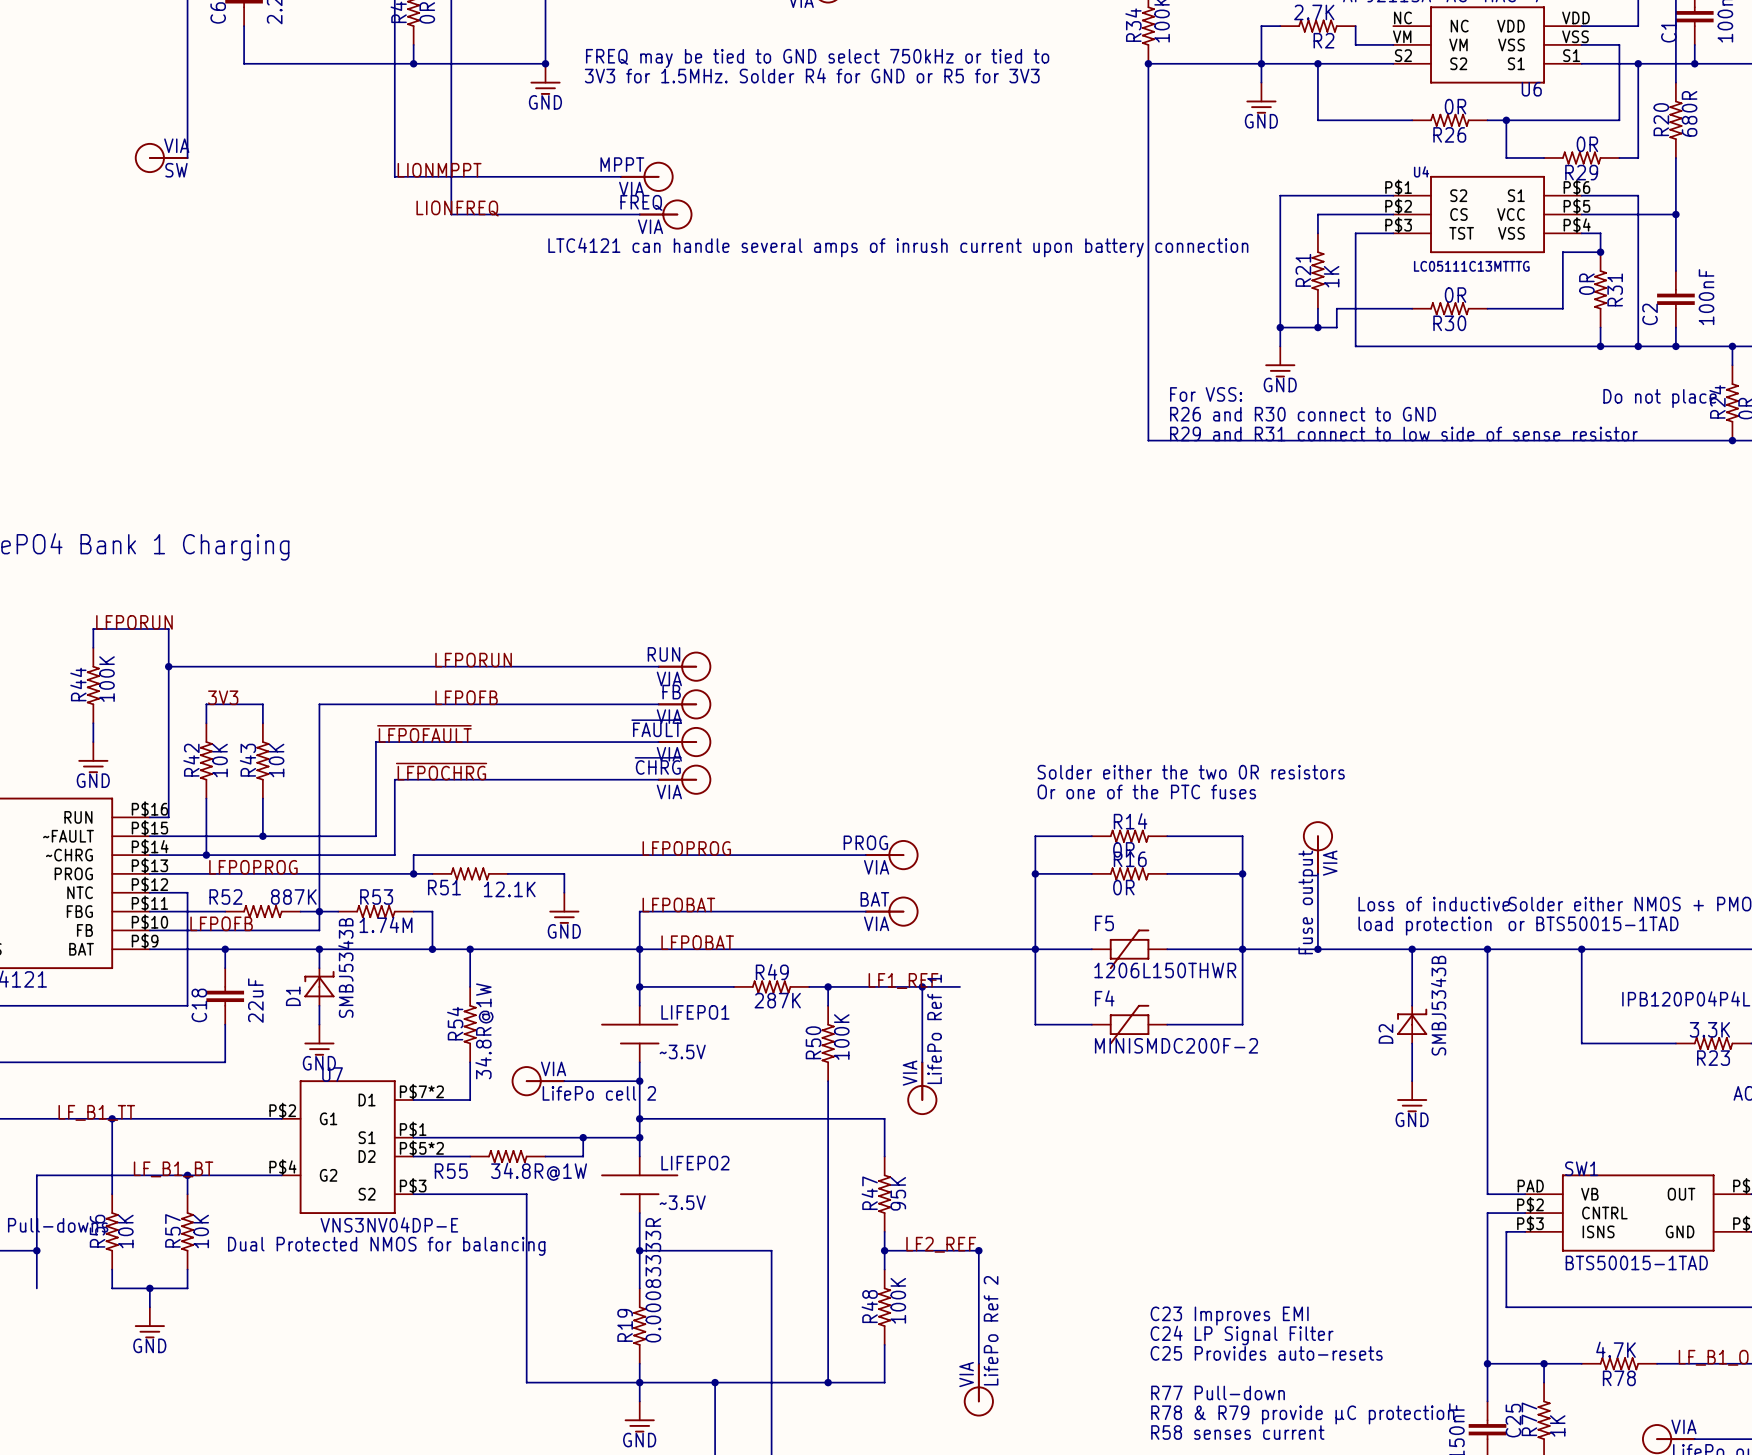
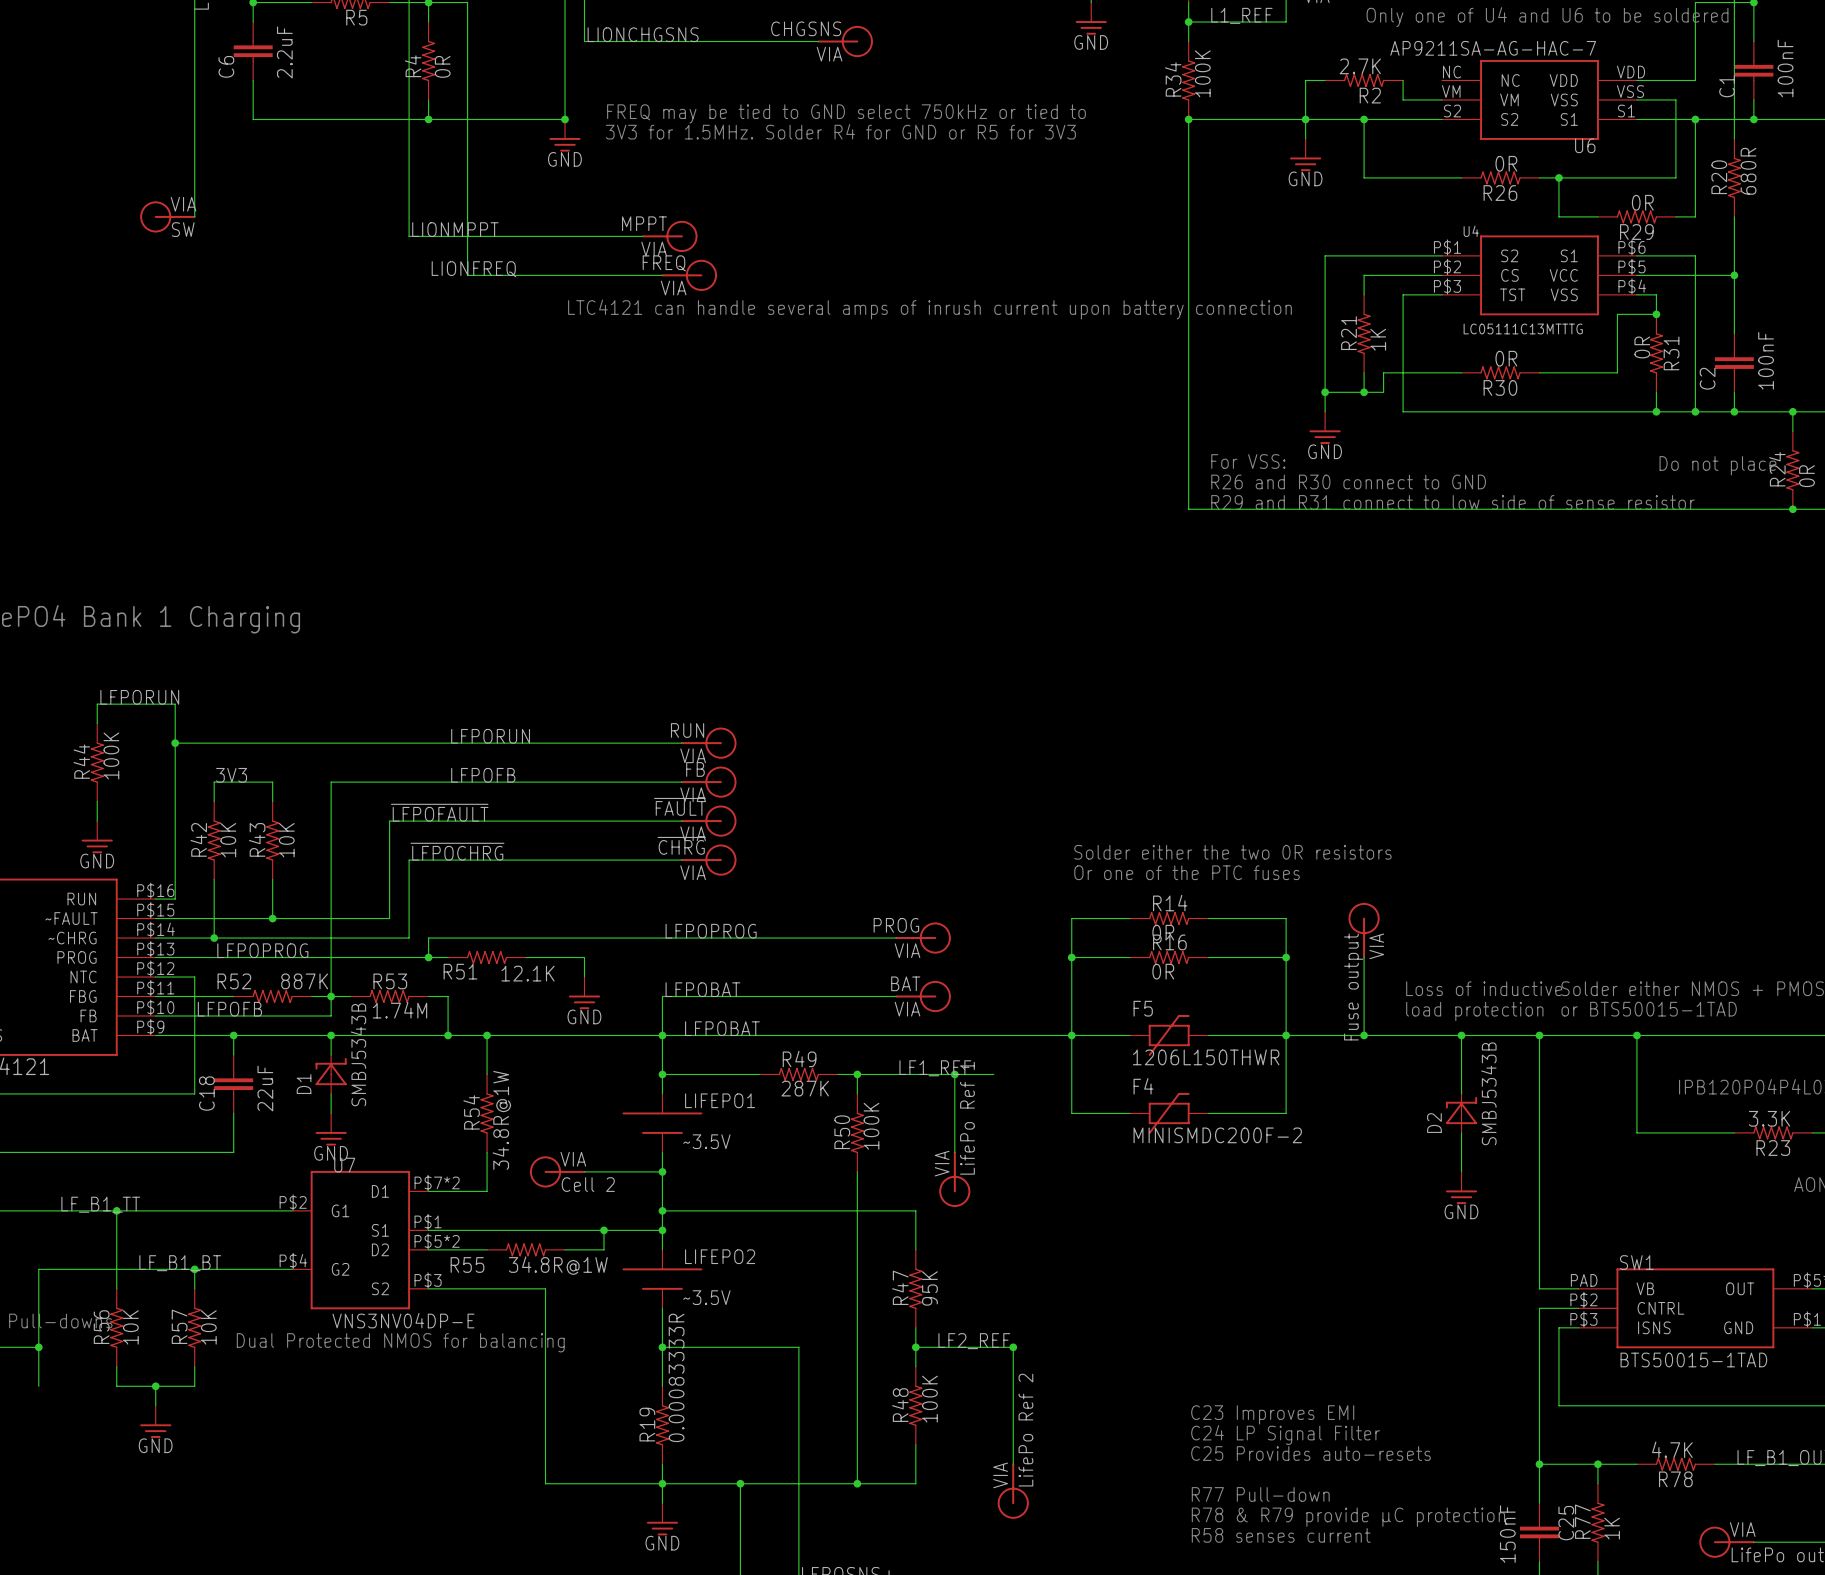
part value: LifePo cell 2 (599, 1093) -> Cell 2 (588, 1184)

